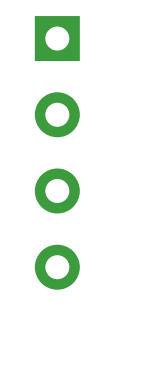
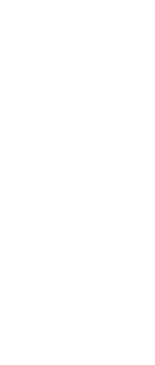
part: (57, 152) -> none

